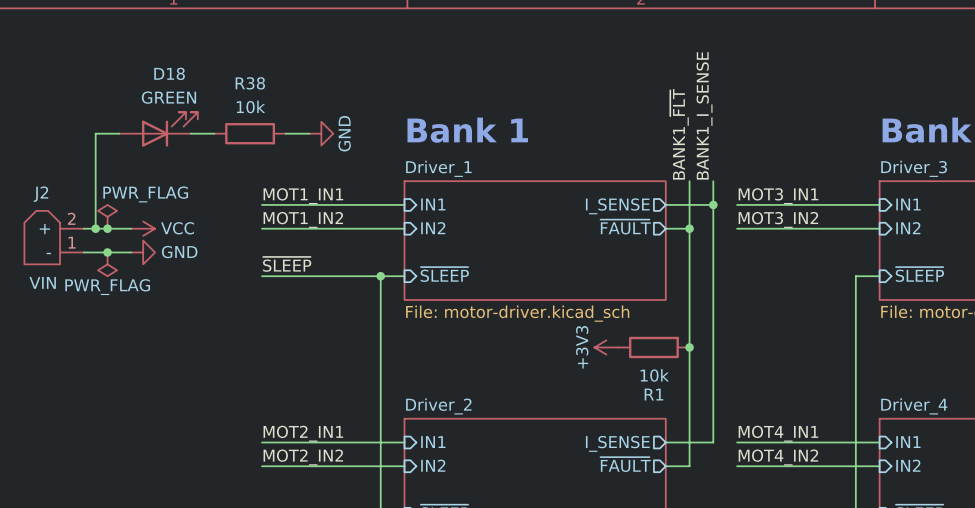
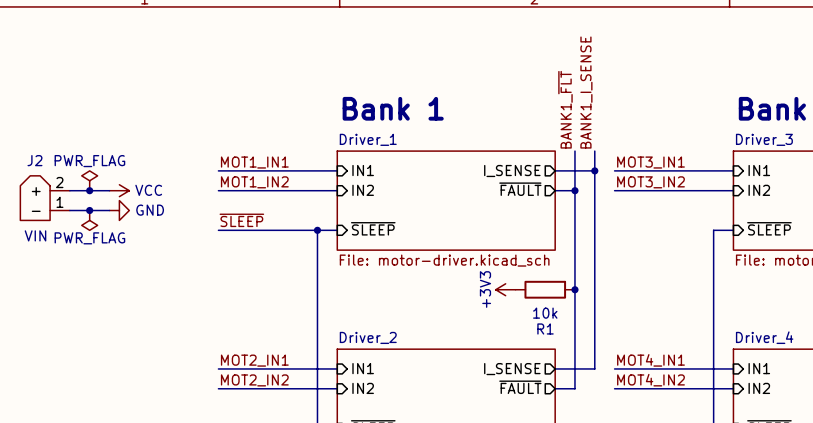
D18: GREEN (158, 129) -> none
wire: (119, 133) (95, 133) (95, 228) -> none
wire: (190, 133) (214, 133) -> none
R38: 10k (250, 133) -> none
wire: (285, 133) (309, 133) -> none
power symbol: GND (321, 133) -> none
power symbol text position: PWR_FLAG (145, 194) -> PWR_FLAG (89, 161)
junction: (95, 228) -> none

